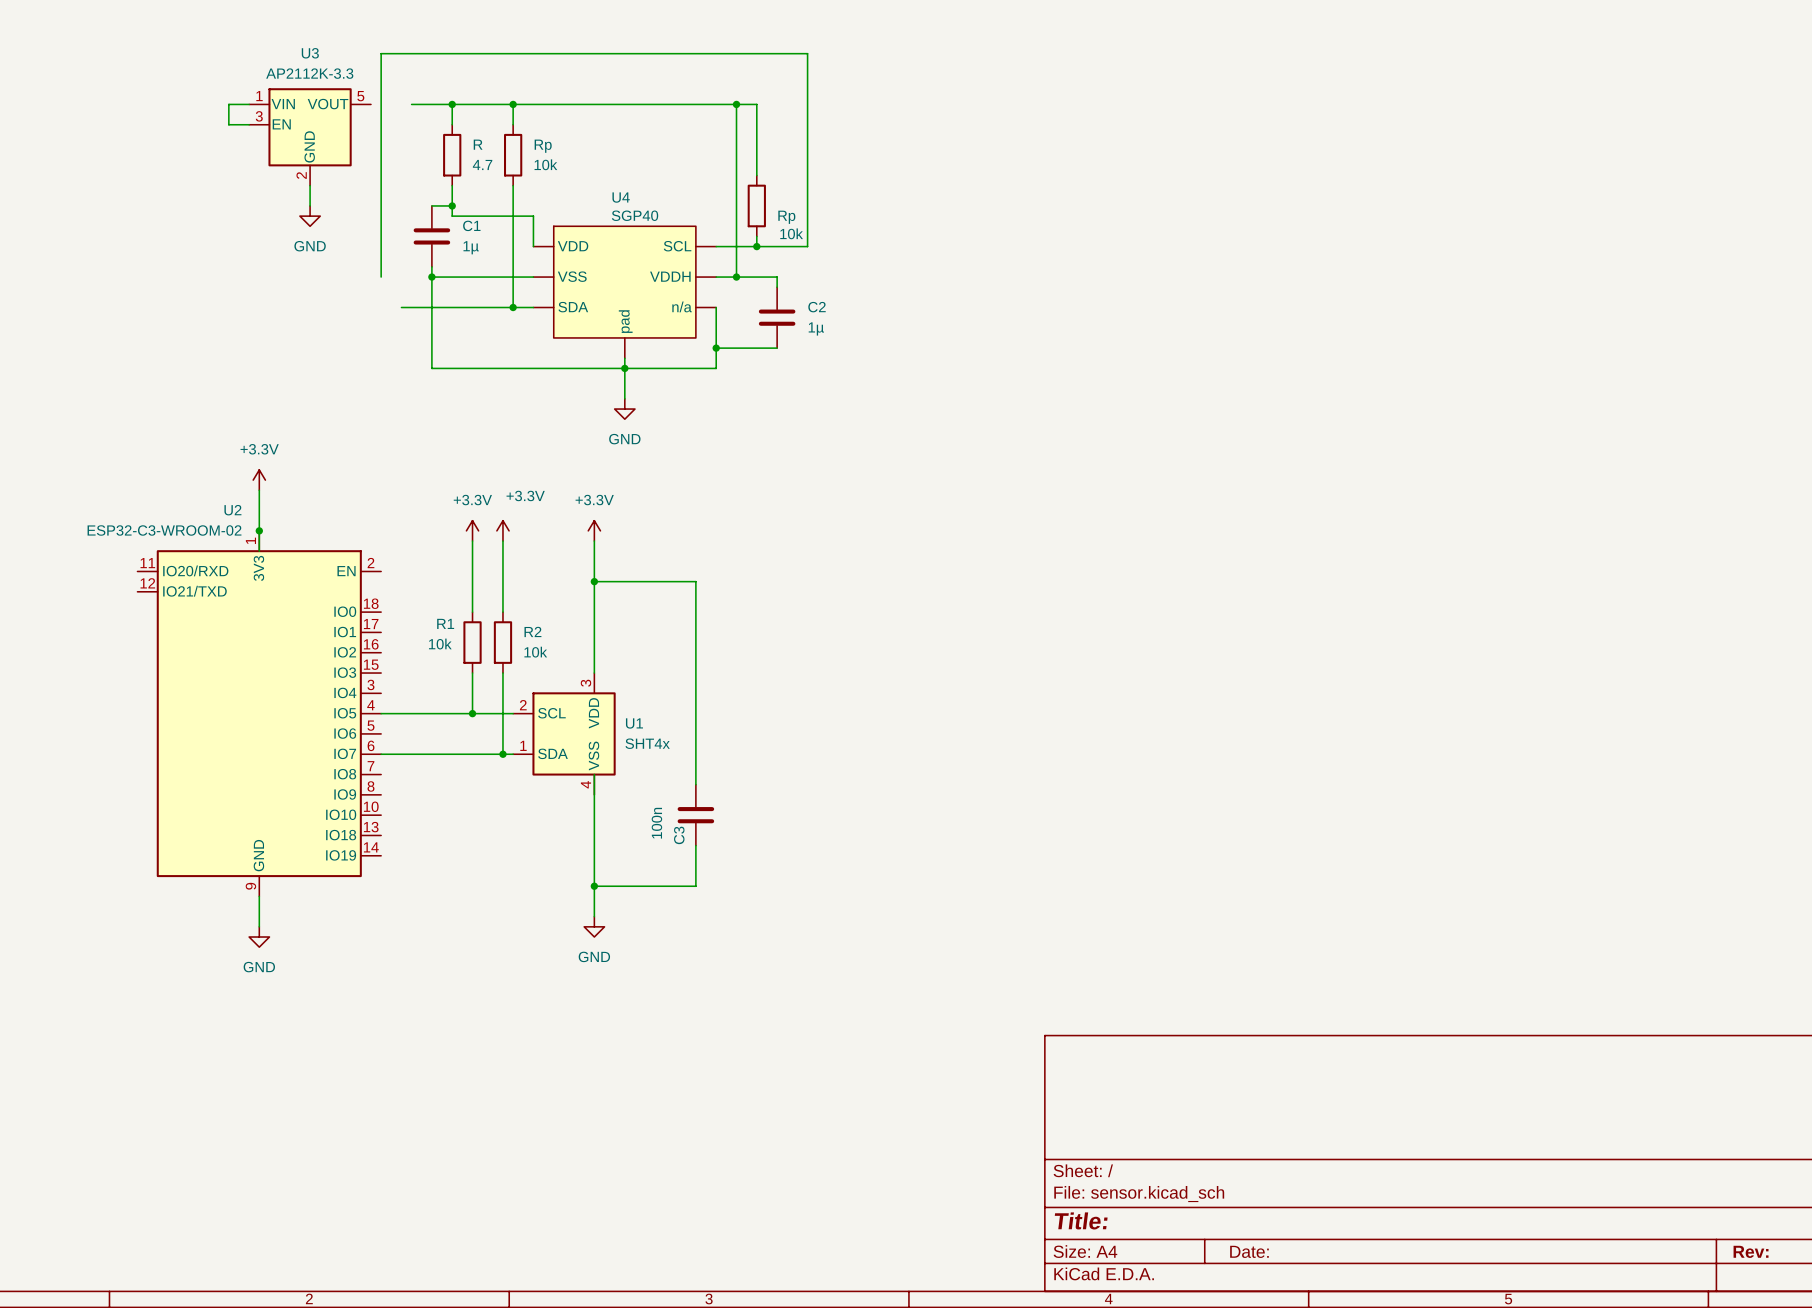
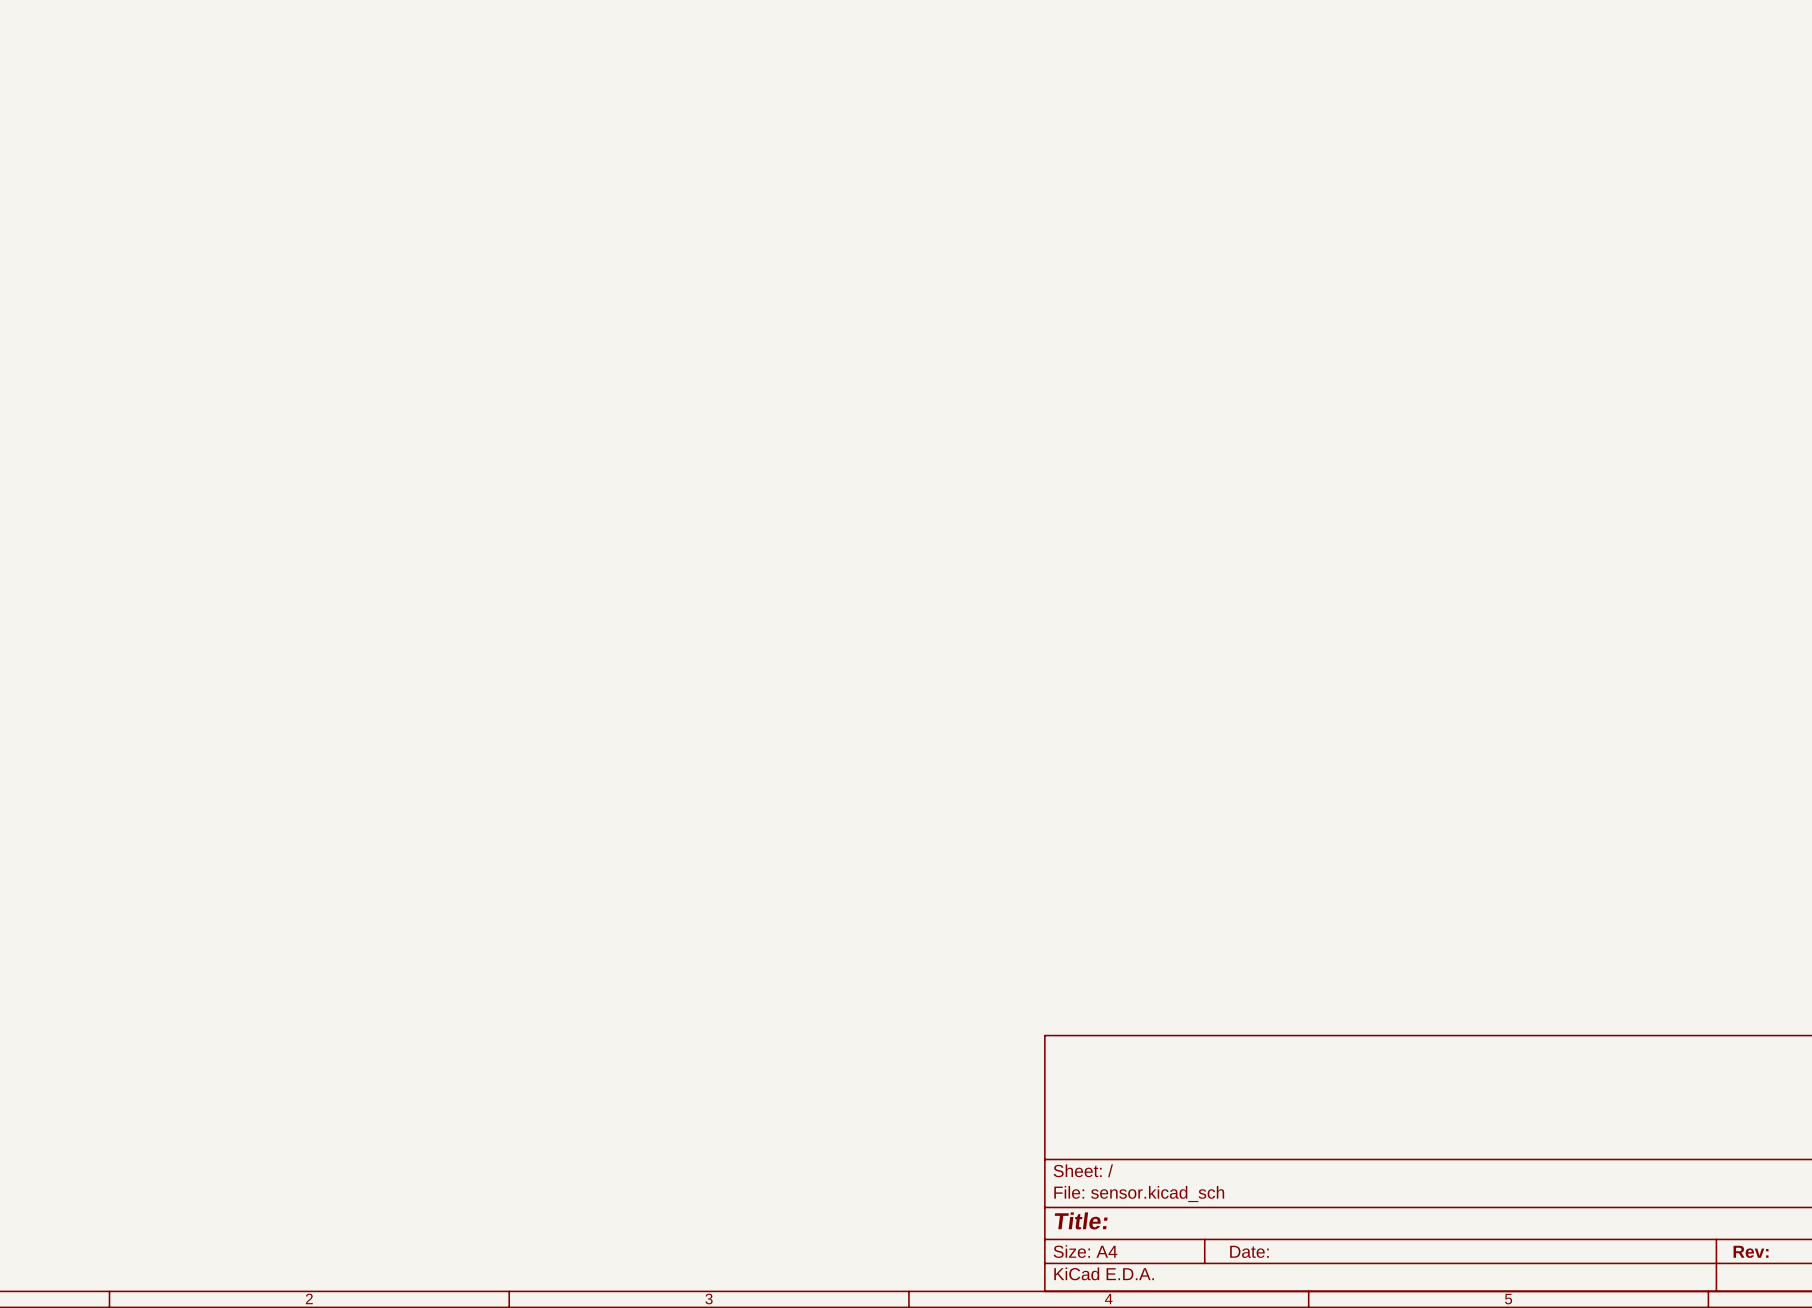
wire: (249, 104) (228, 104) (228, 124) (249, 124) -> none
wire: (411, 104) (756, 104) (756, 175) -> none
wire: (452, 104) (452, 124) -> none
junction: (452, 104) -> none
wire: (513, 104) (513, 124) -> none
junction: (513, 104) -> none
wire: (736, 104) (736, 277) -> none
junction: (736, 104) -> none
U3: AP2112K-3.3 (310, 136) -> none
R: 4.7 (452, 155) -> none
Rp: 10k (513, 155) -> none
wire: (310, 185) (310, 205) -> none
wire: (452, 185) (452, 216) (533, 216) (533, 246) -> none
wire: (513, 185) (513, 307) -> none
wire: (431, 205) (452, 205) -> none
junction: (452, 205) -> none
Rp: 10k (756, 205) -> none
power symbol: GND (310, 216) -> none
C1: 1µ (431, 236) -> none
wire: (756, 236) (756, 246) -> none
wire: (716, 246) (807, 246) (807, 53) (381, 53) (381, 277) -> none
junction: (756, 246) -> none
wire: (431, 266) (431, 368) (716, 368) (716, 307) -> none
wire: (431, 277) (533, 277) -> none
junction: (431, 277) -> none
wire: (716, 277) (777, 277) (777, 287) -> none
junction: (736, 277) -> none
U4: SGP40 (624, 292) -> none
wire: (401, 307) (533, 307) -> none
junction: (513, 307) -> none
C2: 1µ (777, 317) -> none
wire: (716, 348) (777, 348) -> none
junction: (716, 348) -> none
wire: (624, 358) (624, 398) -> none
junction: (624, 368) -> none
power symbol: GND (624, 409) -> none
power symbol: +3.3V (259, 480) -> none
wire: (259, 490) (259, 551) -> none
junction: (259, 530) -> none
power symbol: +3.3V (472, 530) -> none
power symbol: +3.3V (502, 530) -> none
power symbol: +3.3V (594, 530) -> none
wire: (472, 541) (472, 612) -> none
wire: (502, 541) (502, 612) -> none
wire: (594, 541) (594, 673) -> none
wire: (594, 581) (695, 581) (695, 784) -> none
junction: (594, 581) -> none
R1: 10k (472, 642) -> none
R2: 10k (502, 642) -> none
wire: (472, 673) (472, 713) -> none
wire: (502, 673) (502, 754) -> none
U2: ESP32-C3-WROOM-02 (259, 713) -> none
wire: (381, 713) (513, 713) -> none
junction: (472, 713) -> none
U1: SHT4x (564, 733) -> none
wire: (381, 754) (513, 754) -> none
junction: (502, 754) -> none
wire: (594, 774) (594, 916) -> none
C3: 100n (695, 815) -> none
wire: (695, 845) (695, 886) (594, 886) -> none
junction: (594, 886) -> none
wire: (259, 896) (259, 926) -> none
power symbol: GND (594, 926) -> none
power symbol: GND (259, 937) -> none

